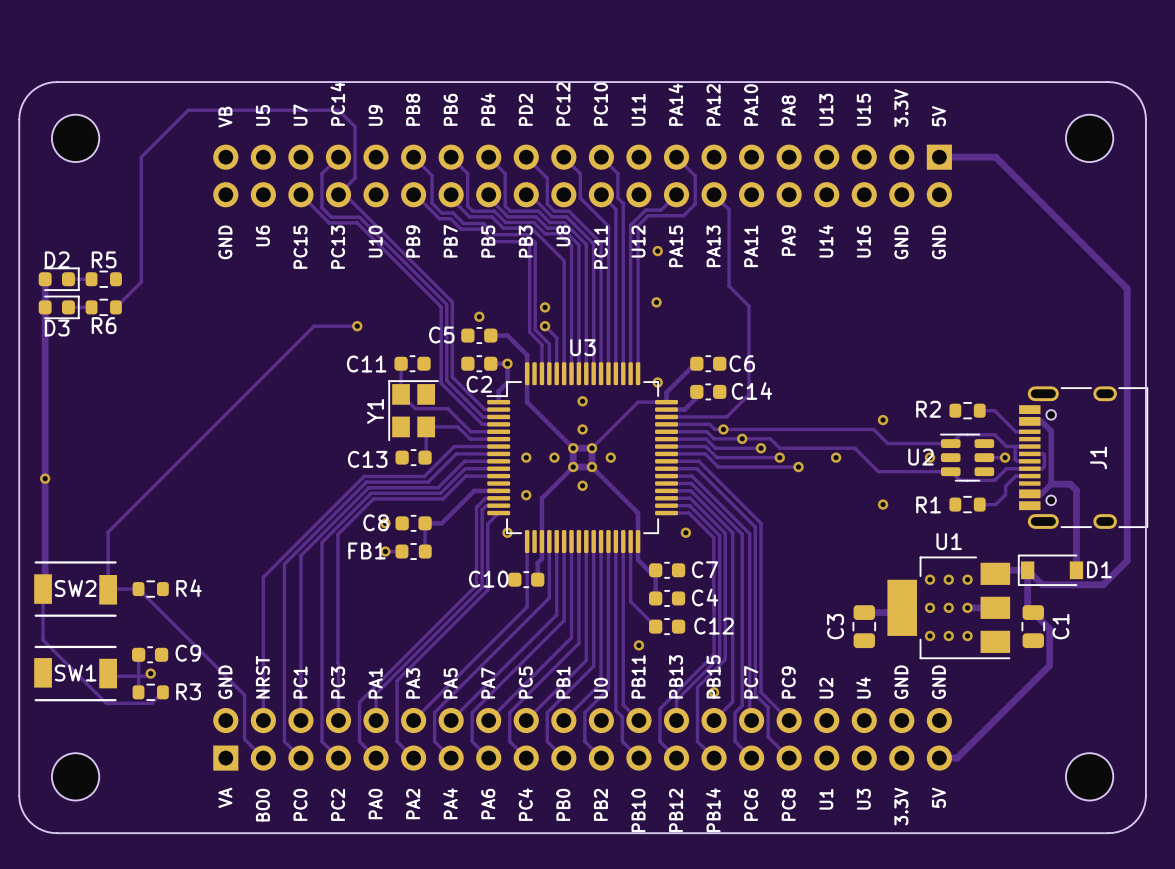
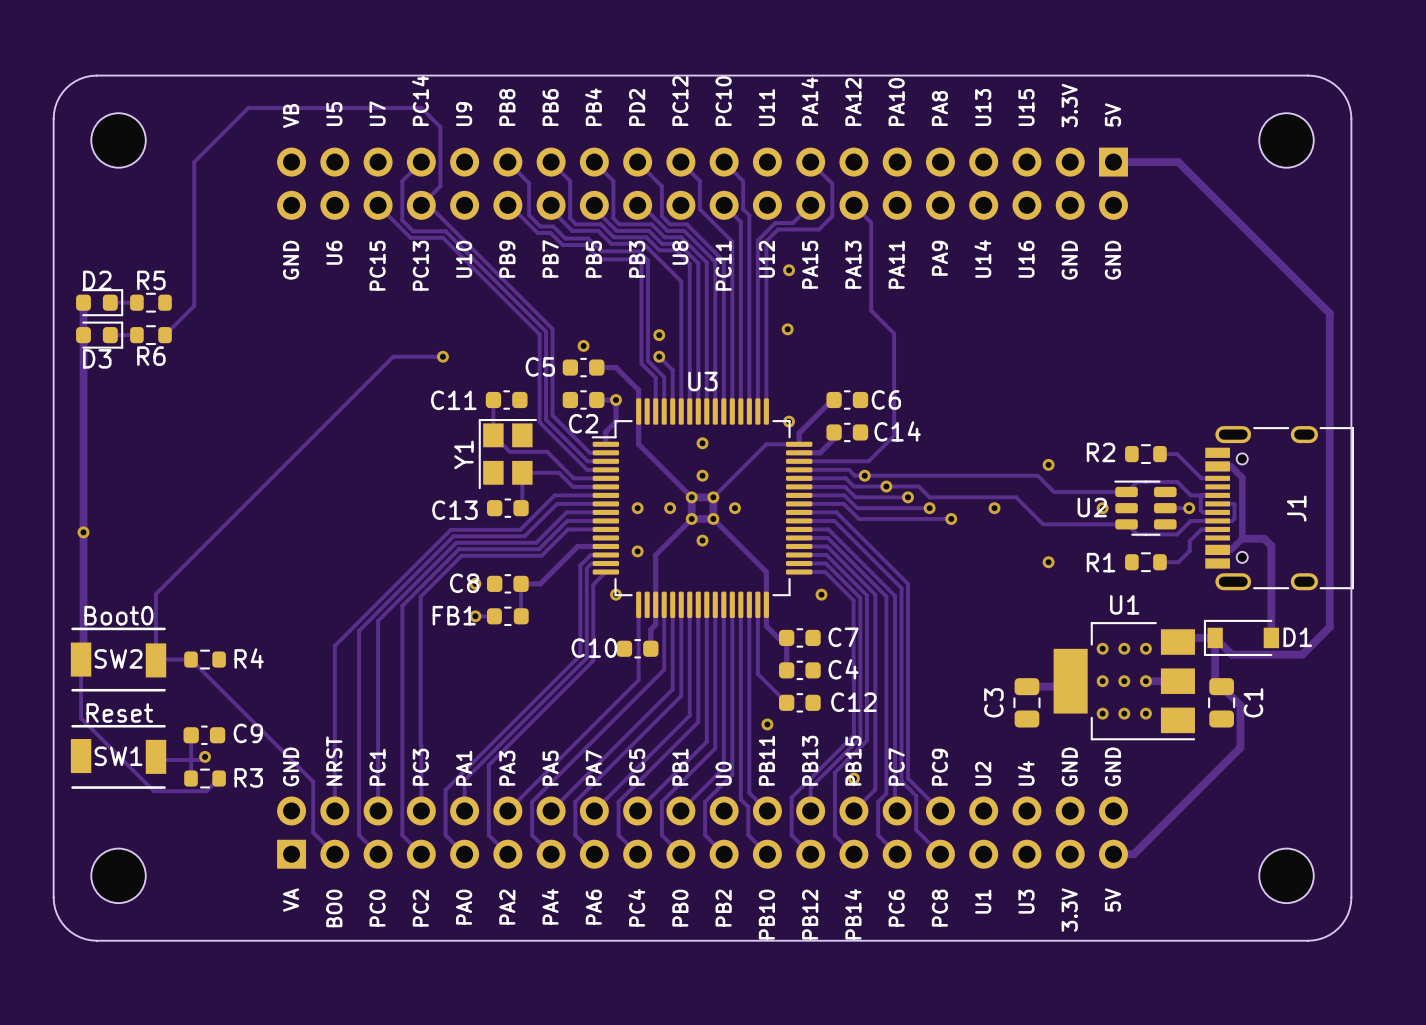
text: none -> Boot0 (118, 615)
text: none -> Reset (119, 713)

